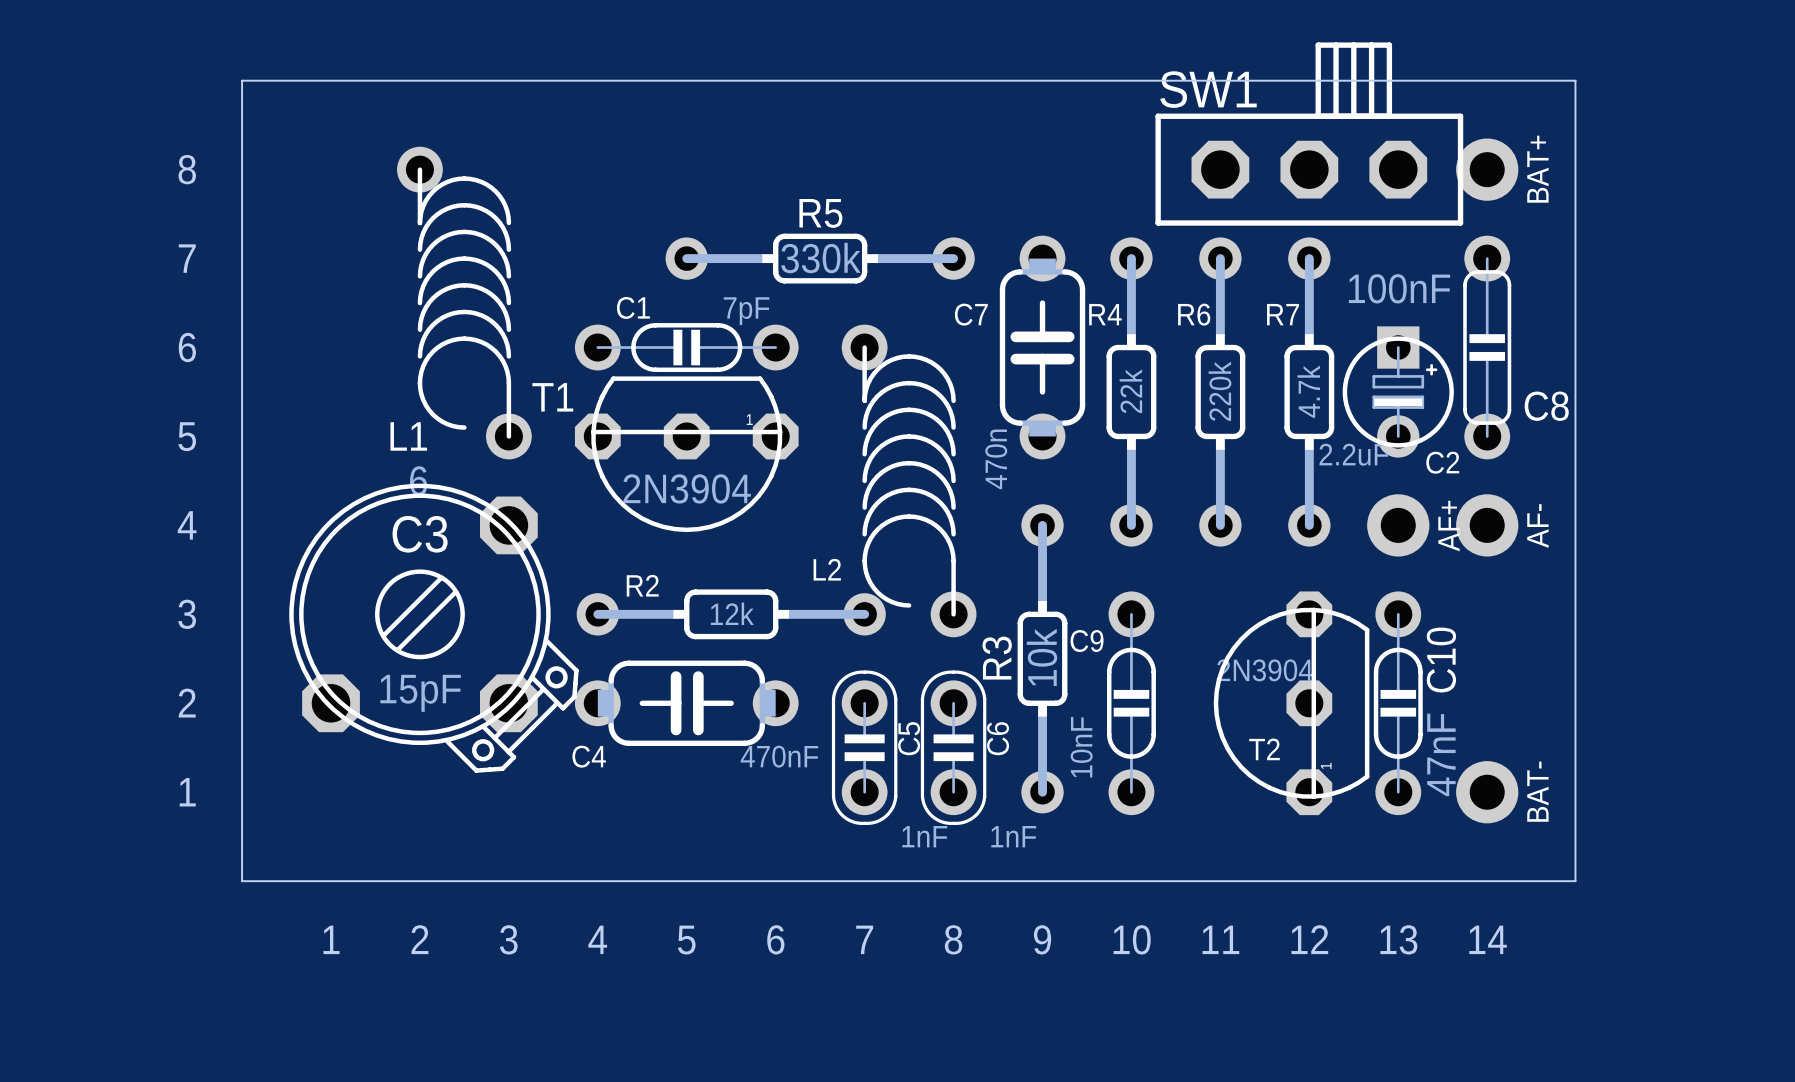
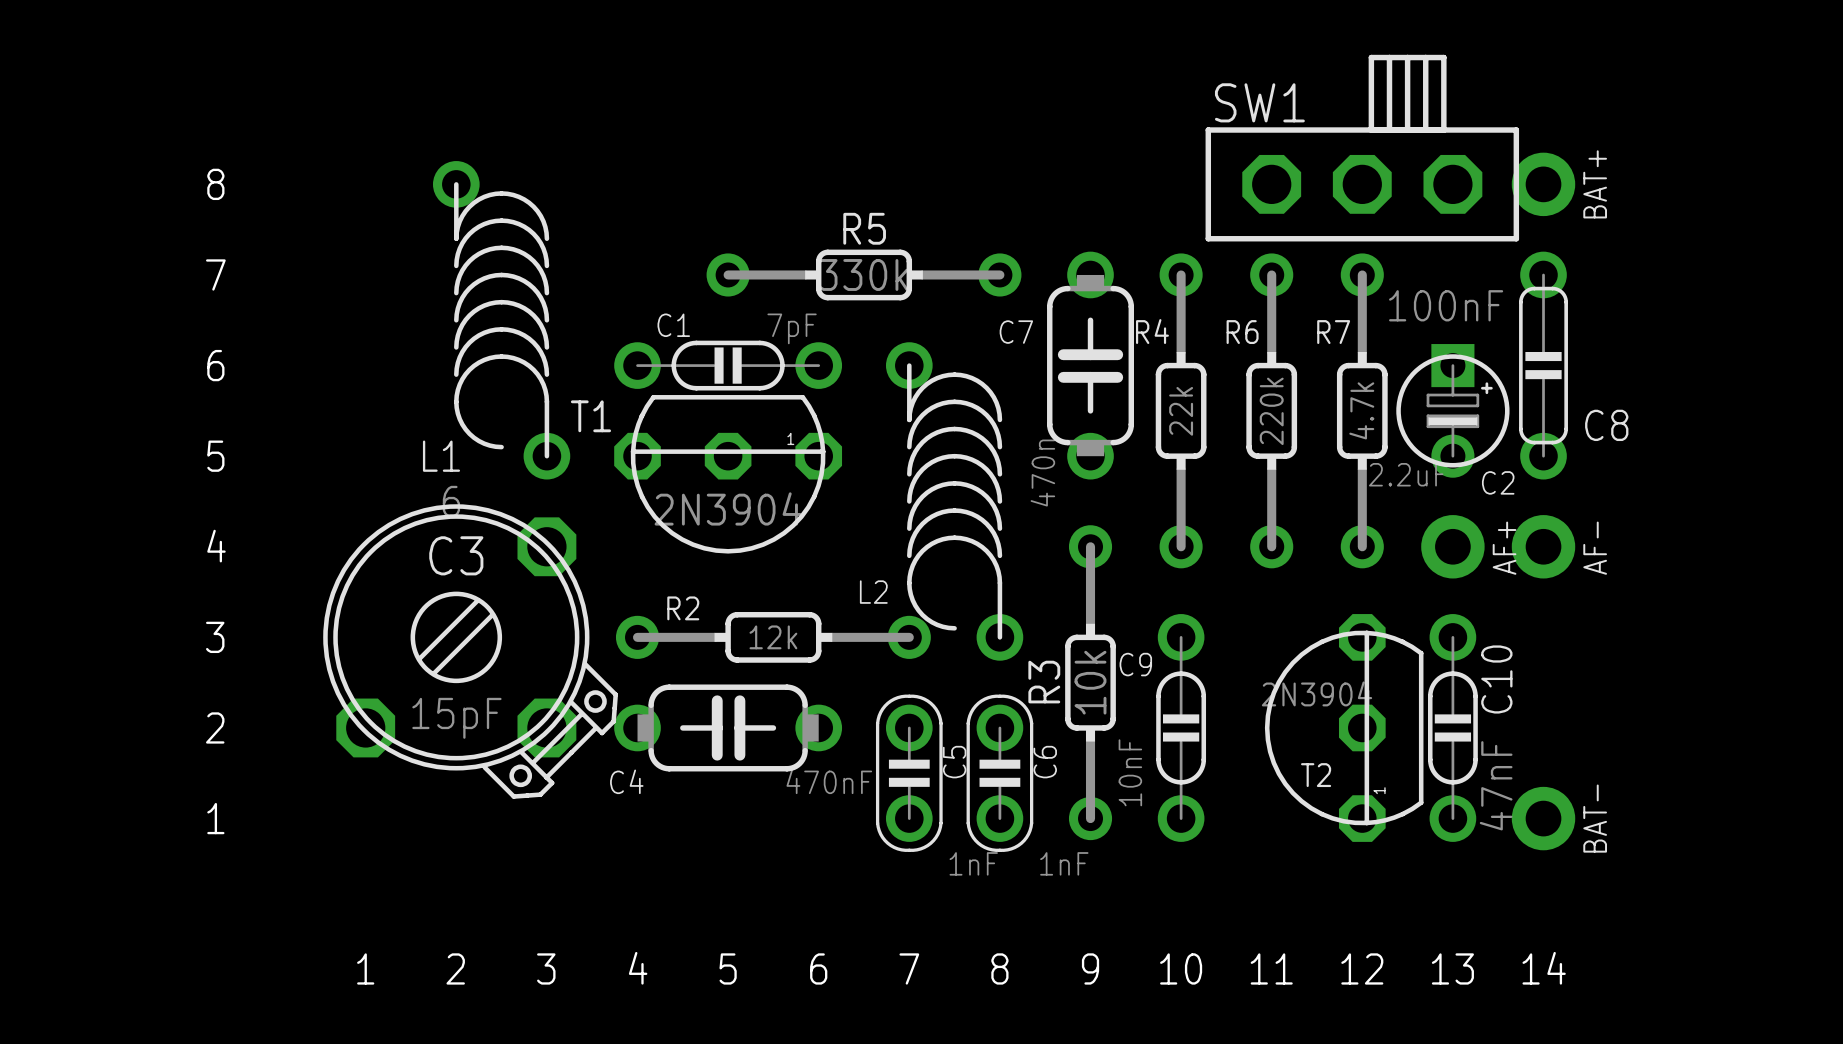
board edge: (242, 80) (1575, 80) (1575, 881) (242, 881) (242, 80) -> none

